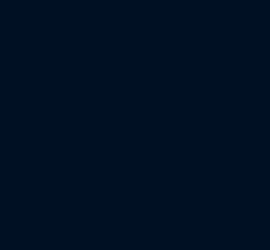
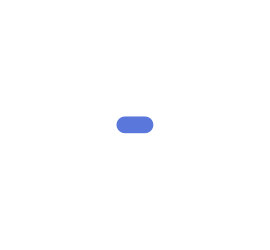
bottom track: none -> (145, 124) (124, 124)

